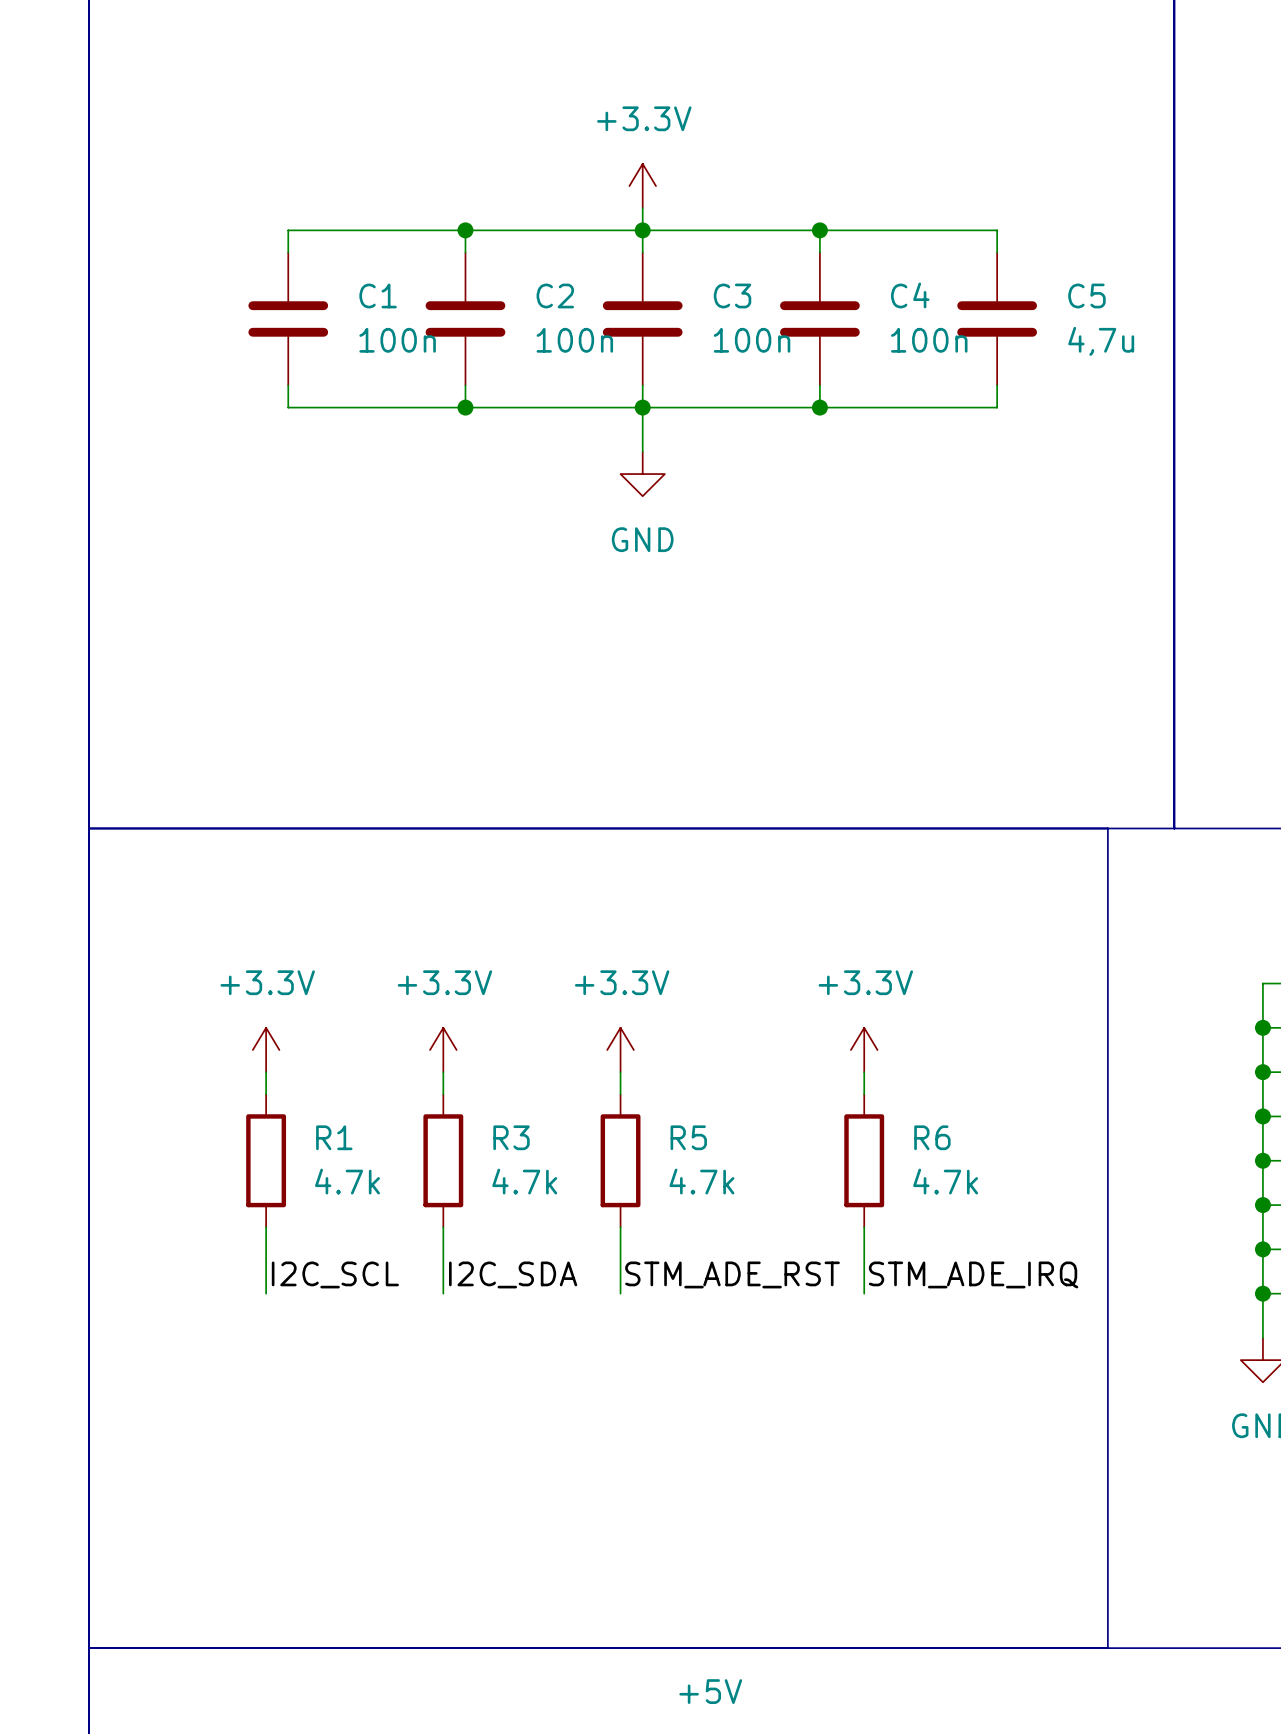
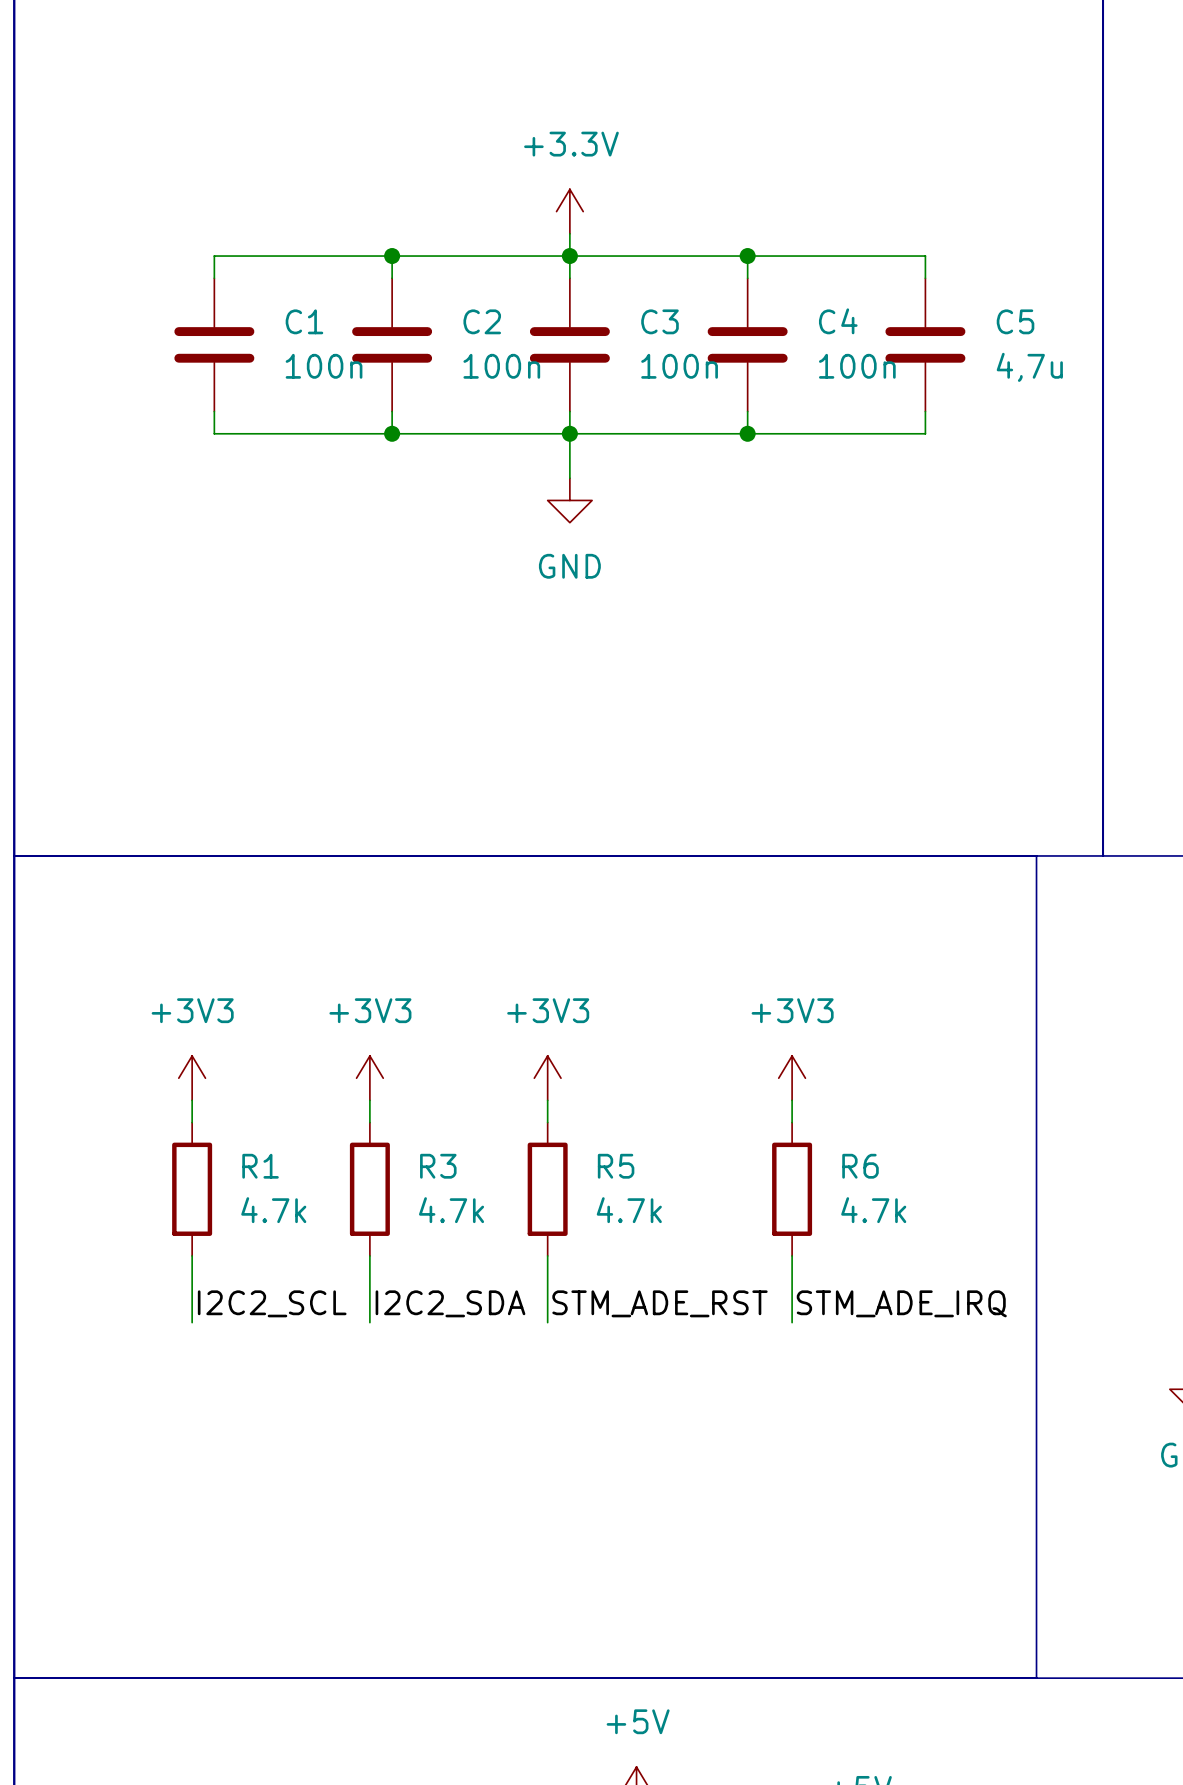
power symbol: +3.3V (266, 1050) -> +3V3 (192, 1078)
power symbol: +3.3V (443, 1050) -> +3V3 (369, 1078)
power symbol: +3.3V (620, 1050) -> +3V3 (547, 1078)
power symbol: +3.3V (864, 1050) -> +3V3 (792, 1078)
label: I2C_SCL (335, 1274) -> I2C2_SCL (272, 1303)
label: I2C_SDA (513, 1274) -> I2C2_SDA (450, 1303)

